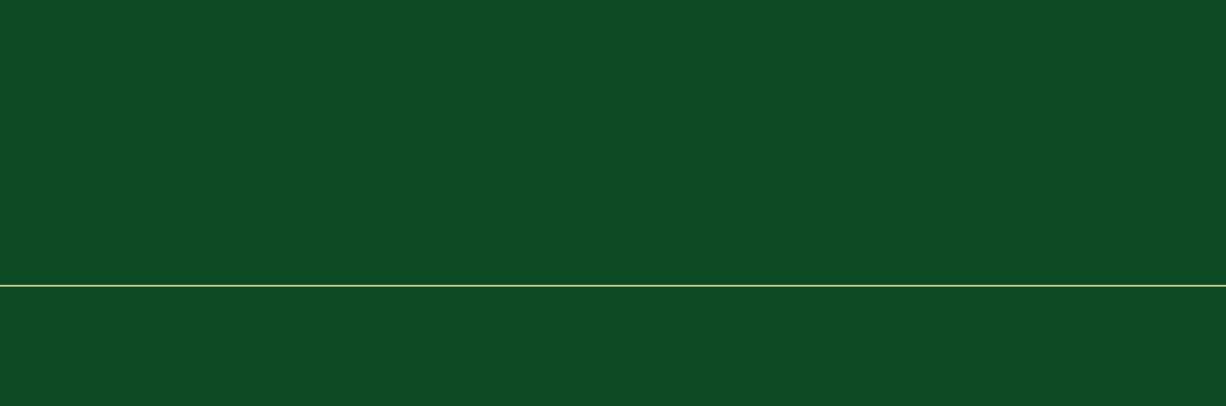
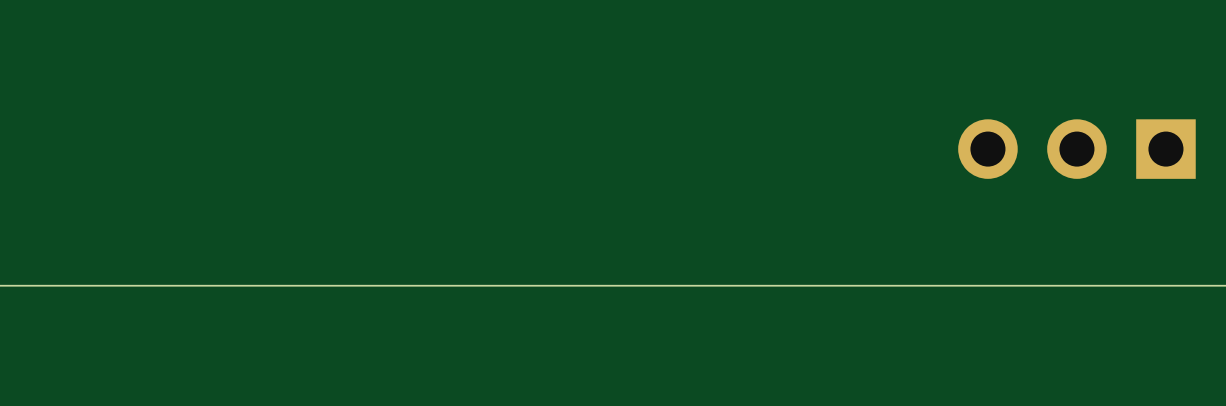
part: none -> (1076, 149)

